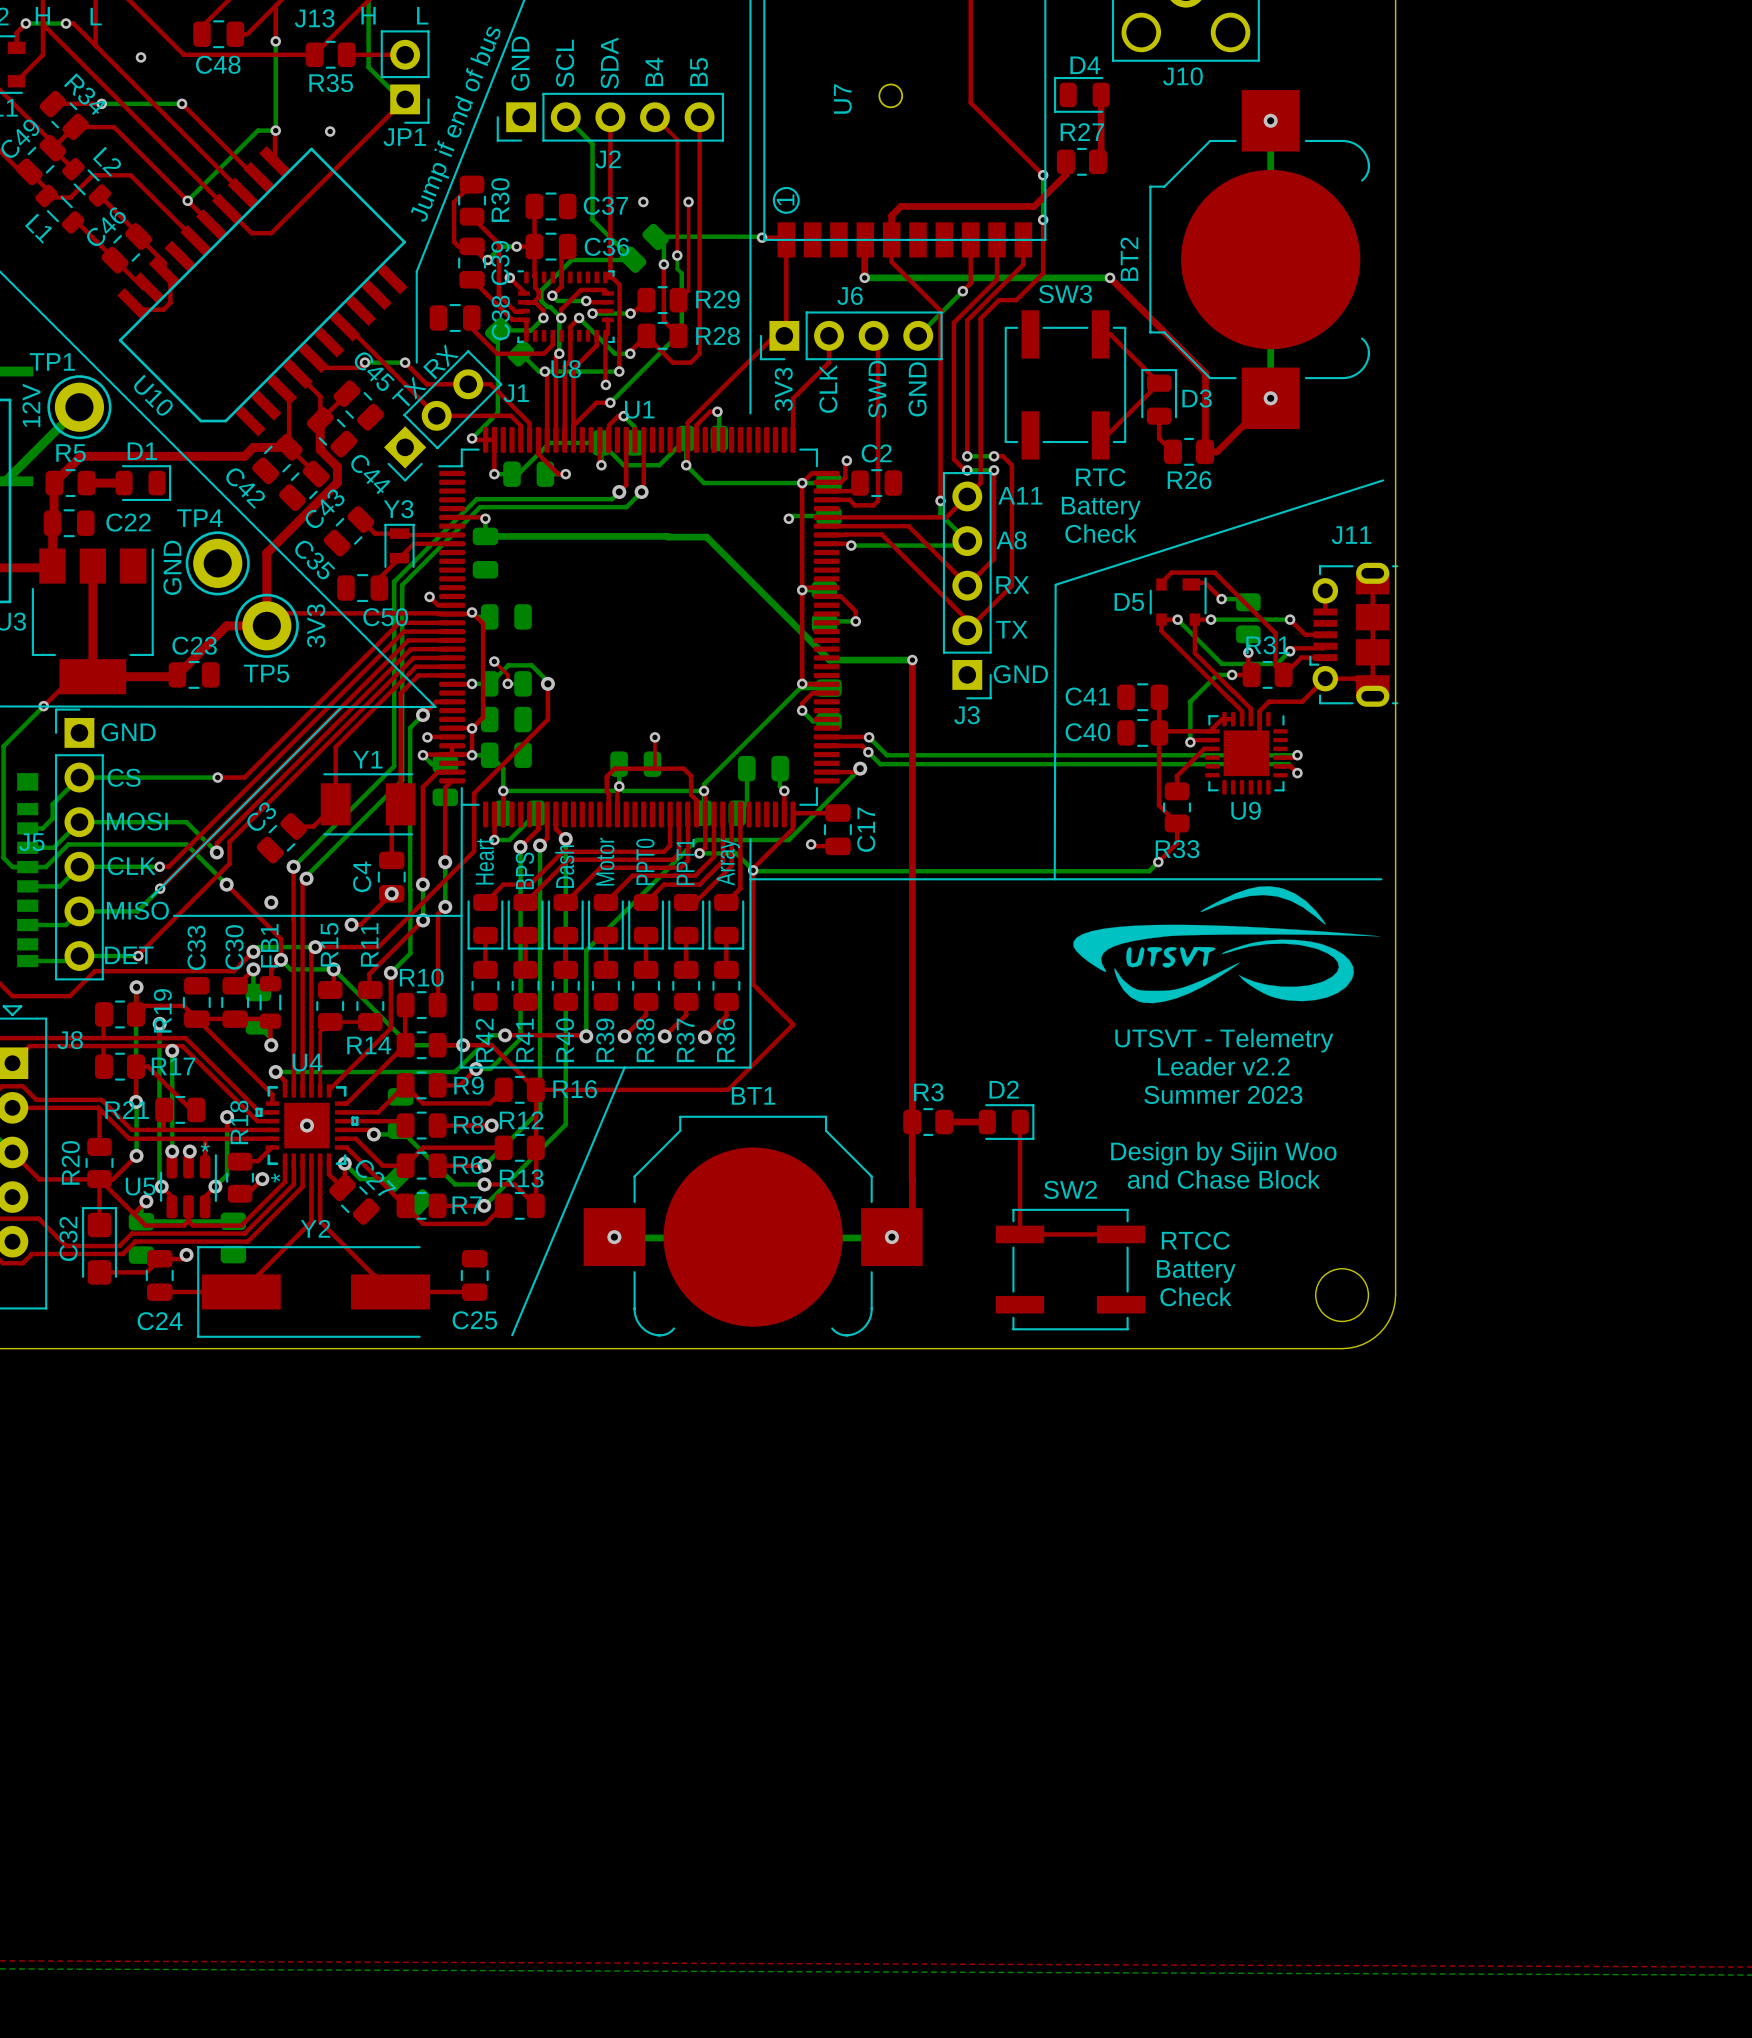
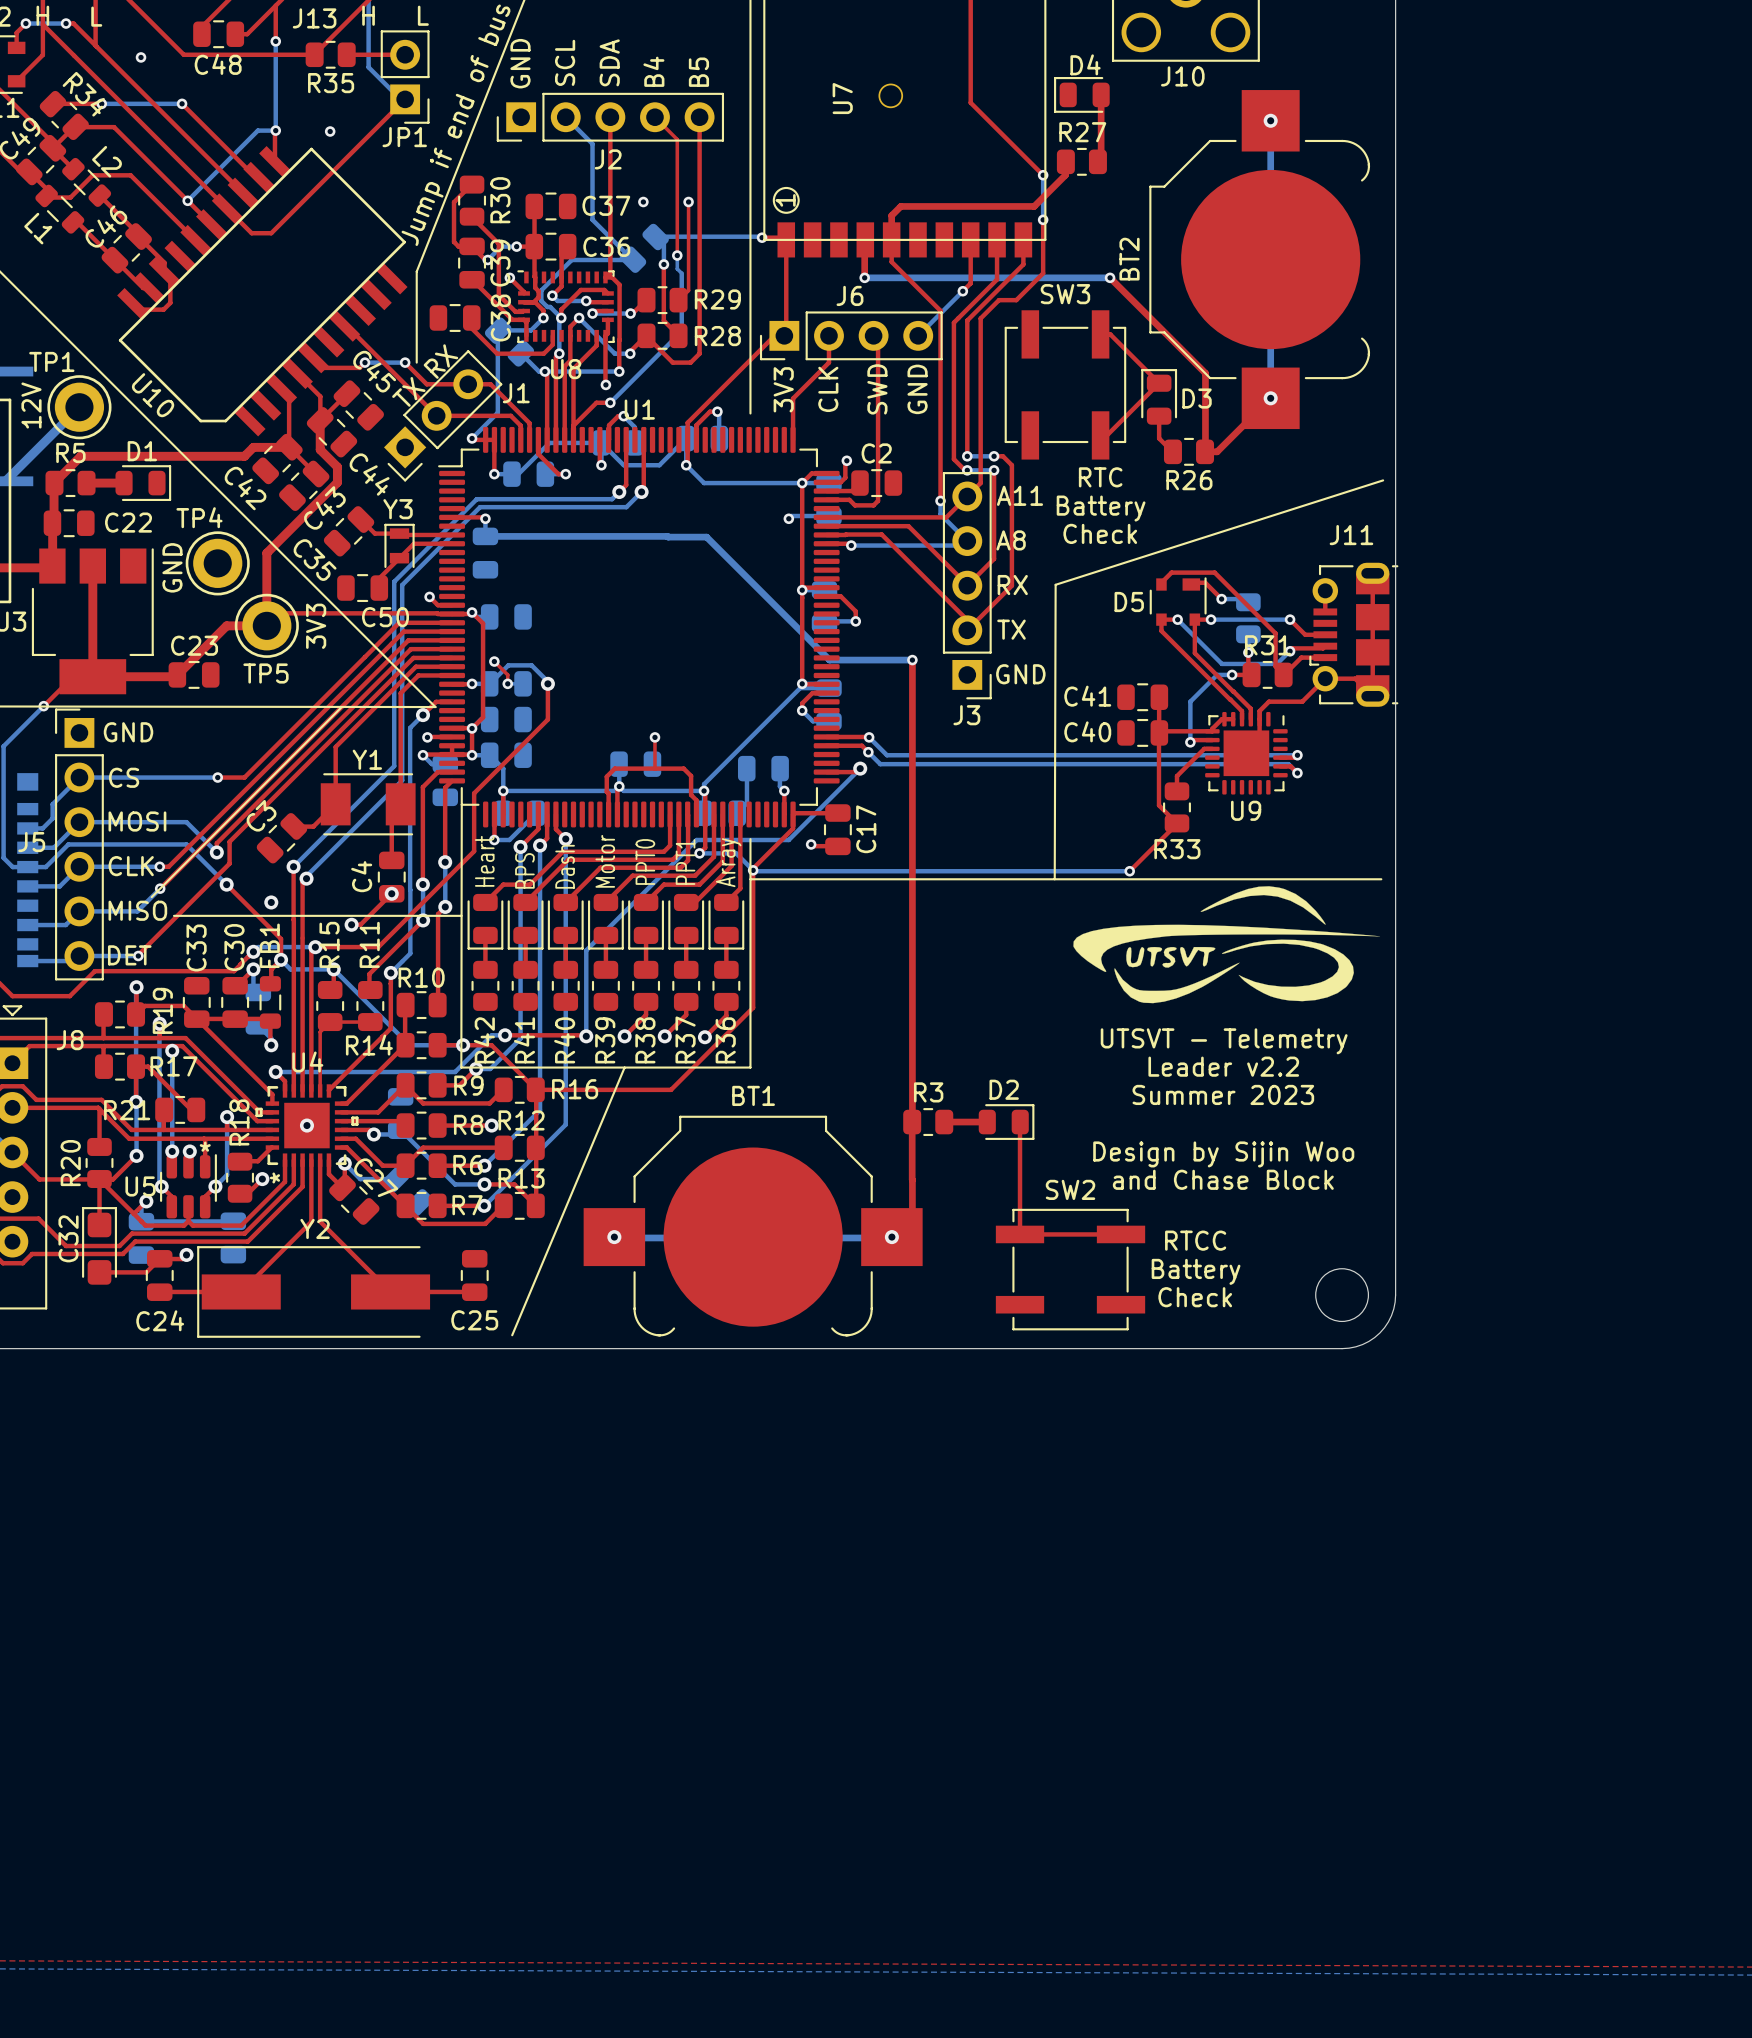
top track: (1176, 823) (1176, 843) (1158, 862) -> (1176, 823) (1129, 871)
bottom track: (1158, 862) (1149, 871) (1129, 871) -> none
via position: (1158, 862) -> (1129, 871)
top track: (753, 984) (793, 1024) (728, 1089) (671, 1089) -> (753, 984) (753, 1007) (671, 1089)

